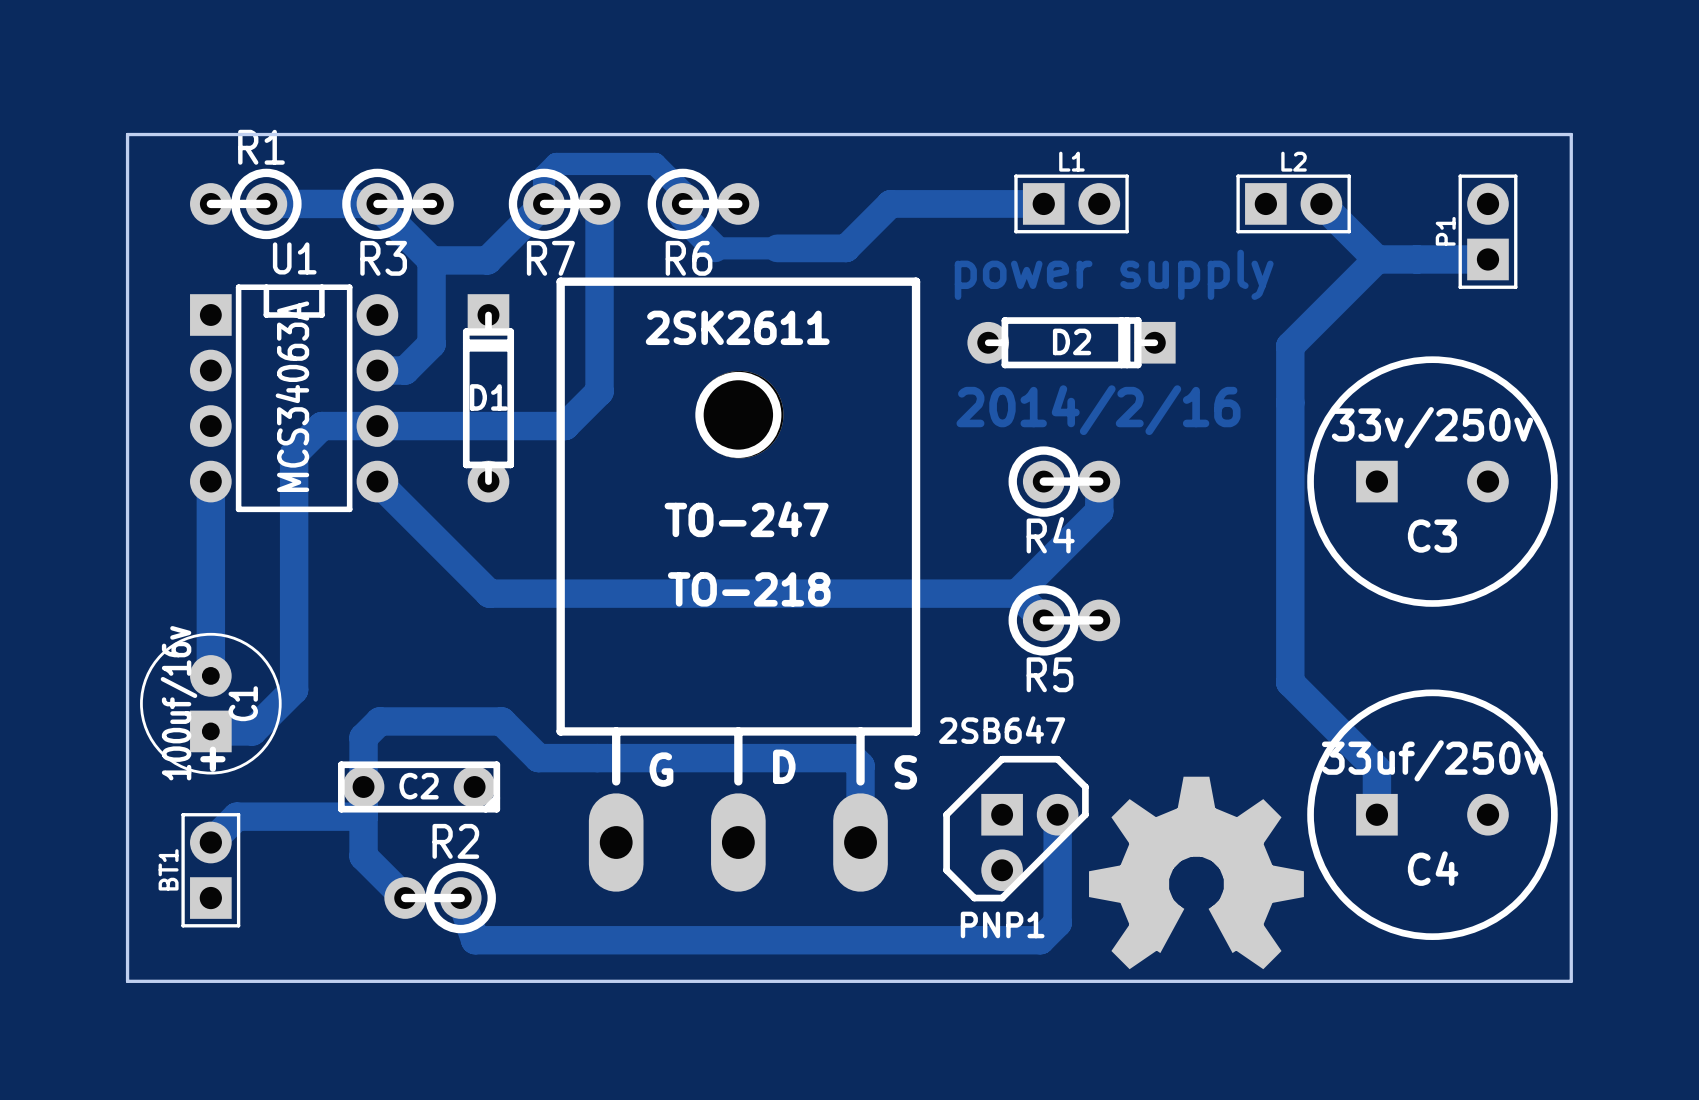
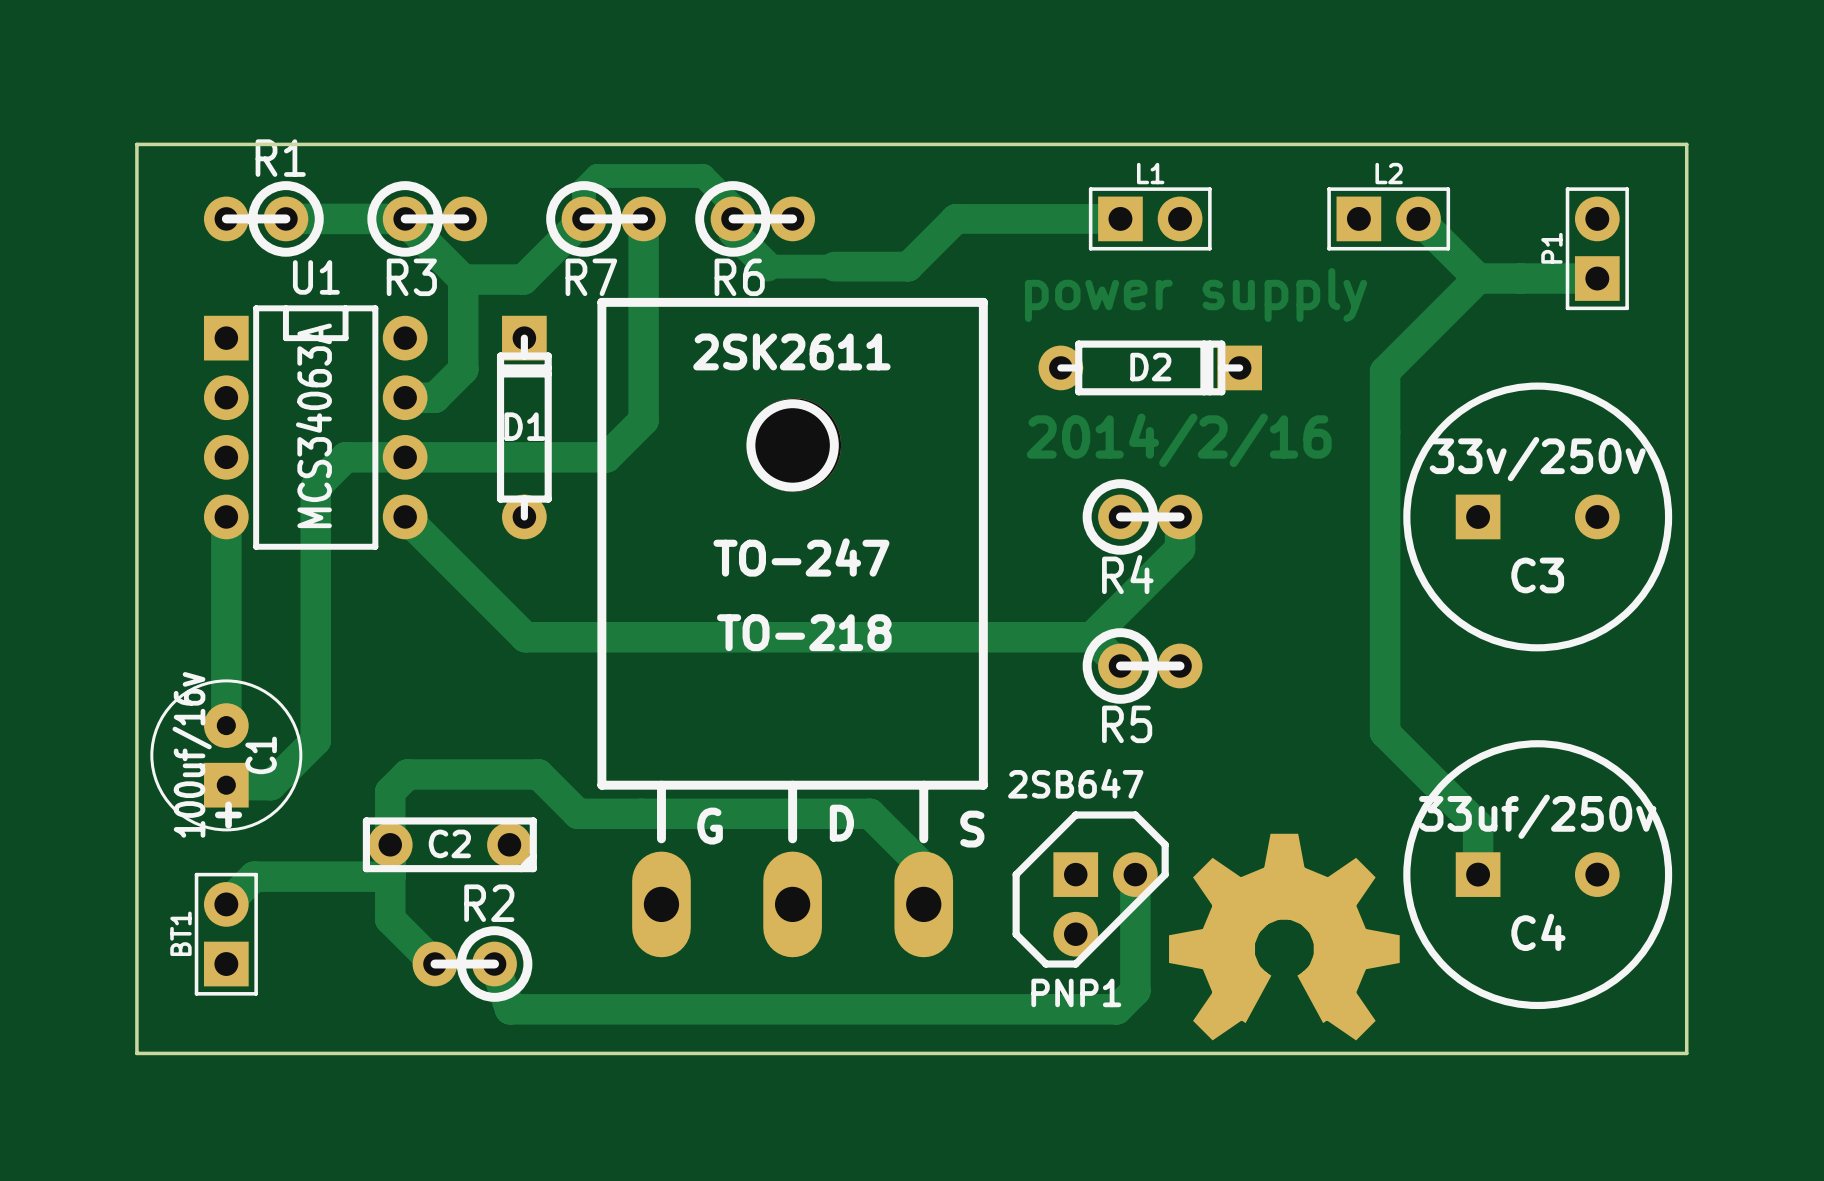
track: (810, 758) (852, 758) (860, 765) (860, 808) -> (870, 813) (923, 867)

